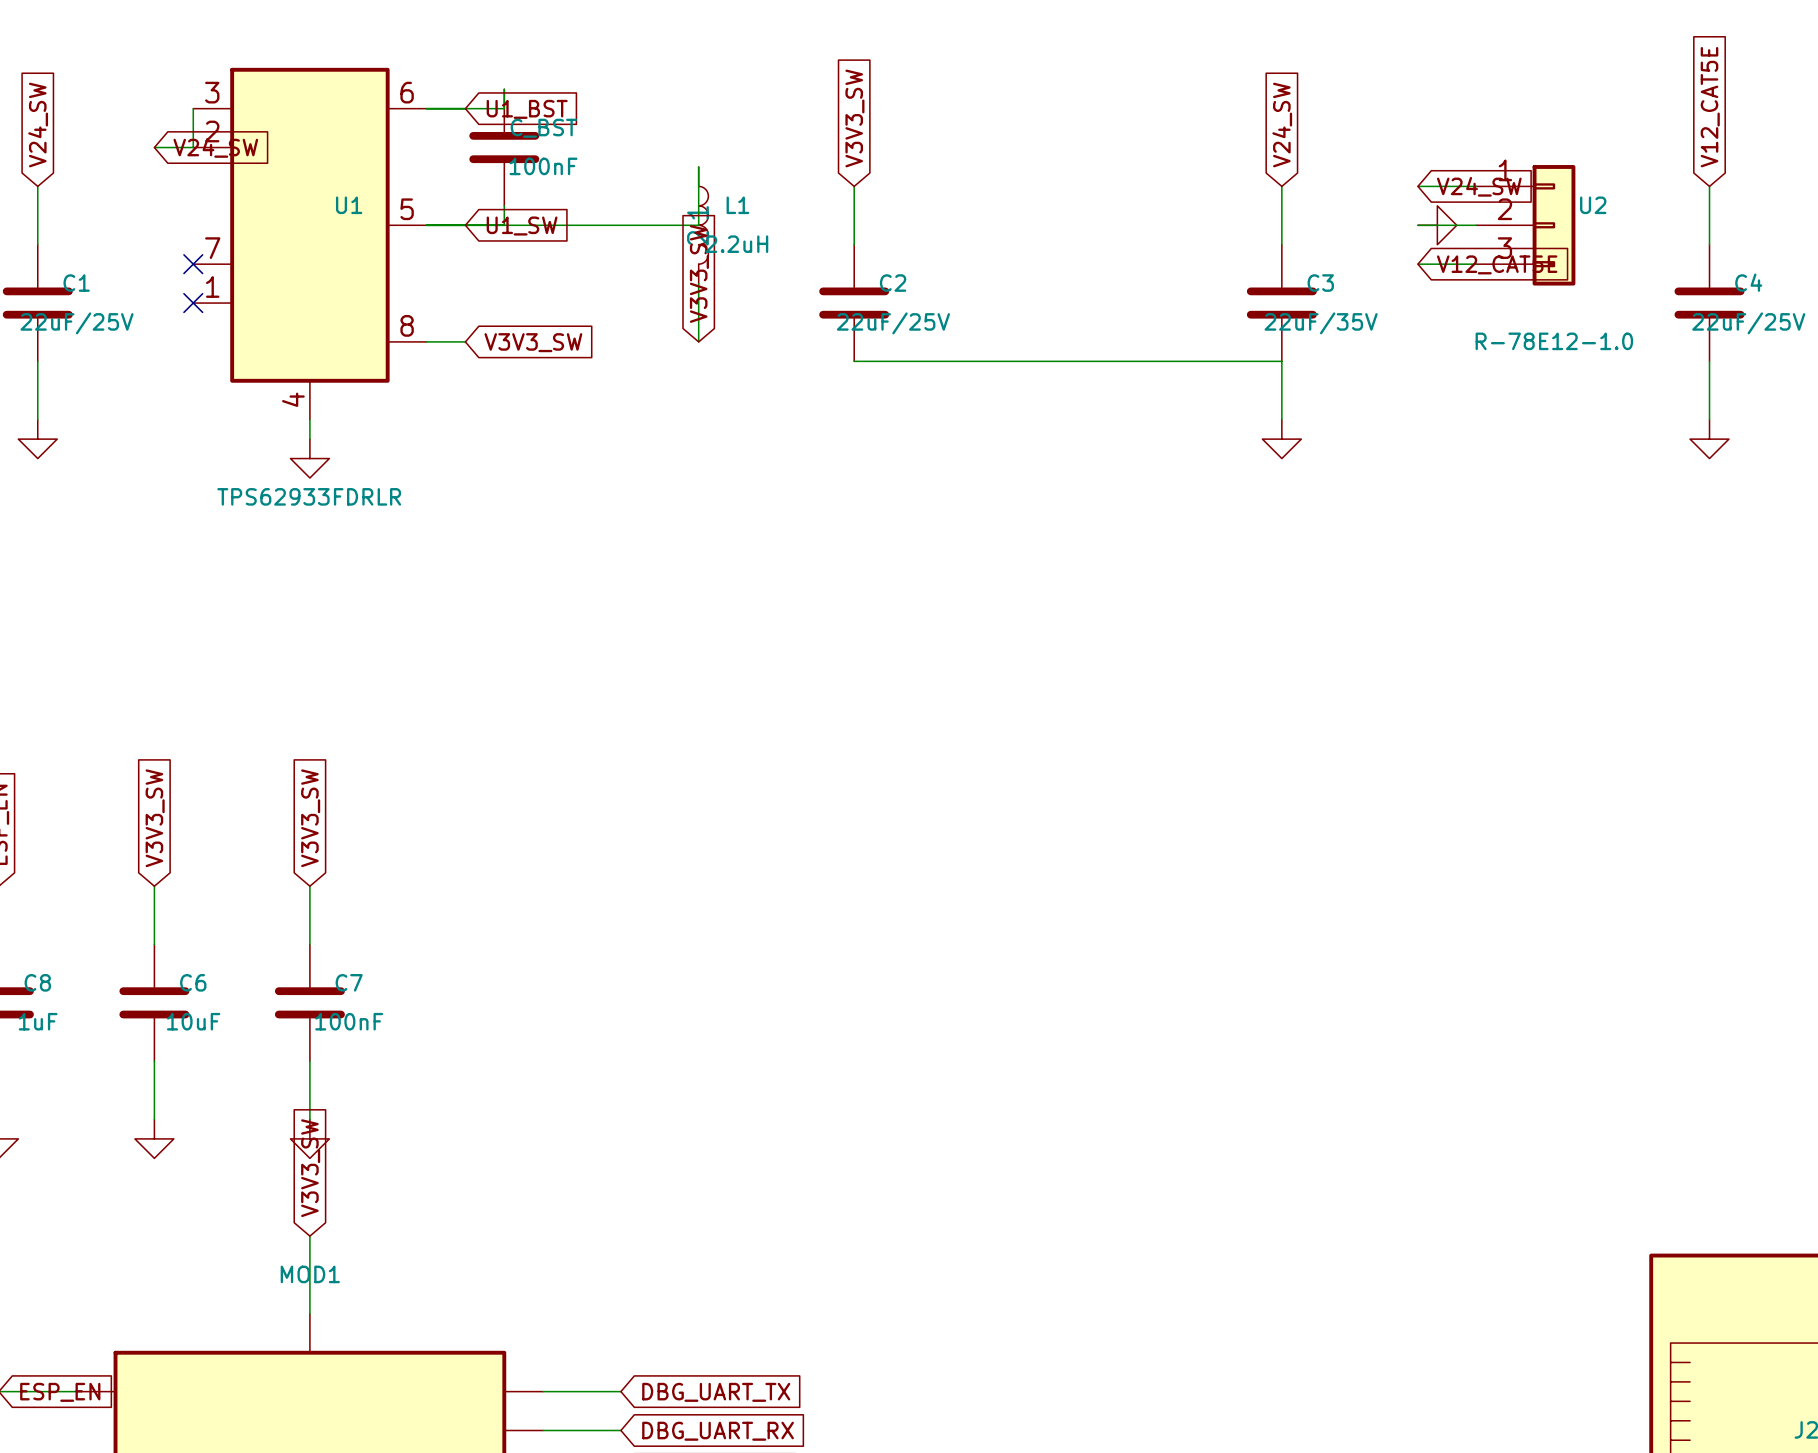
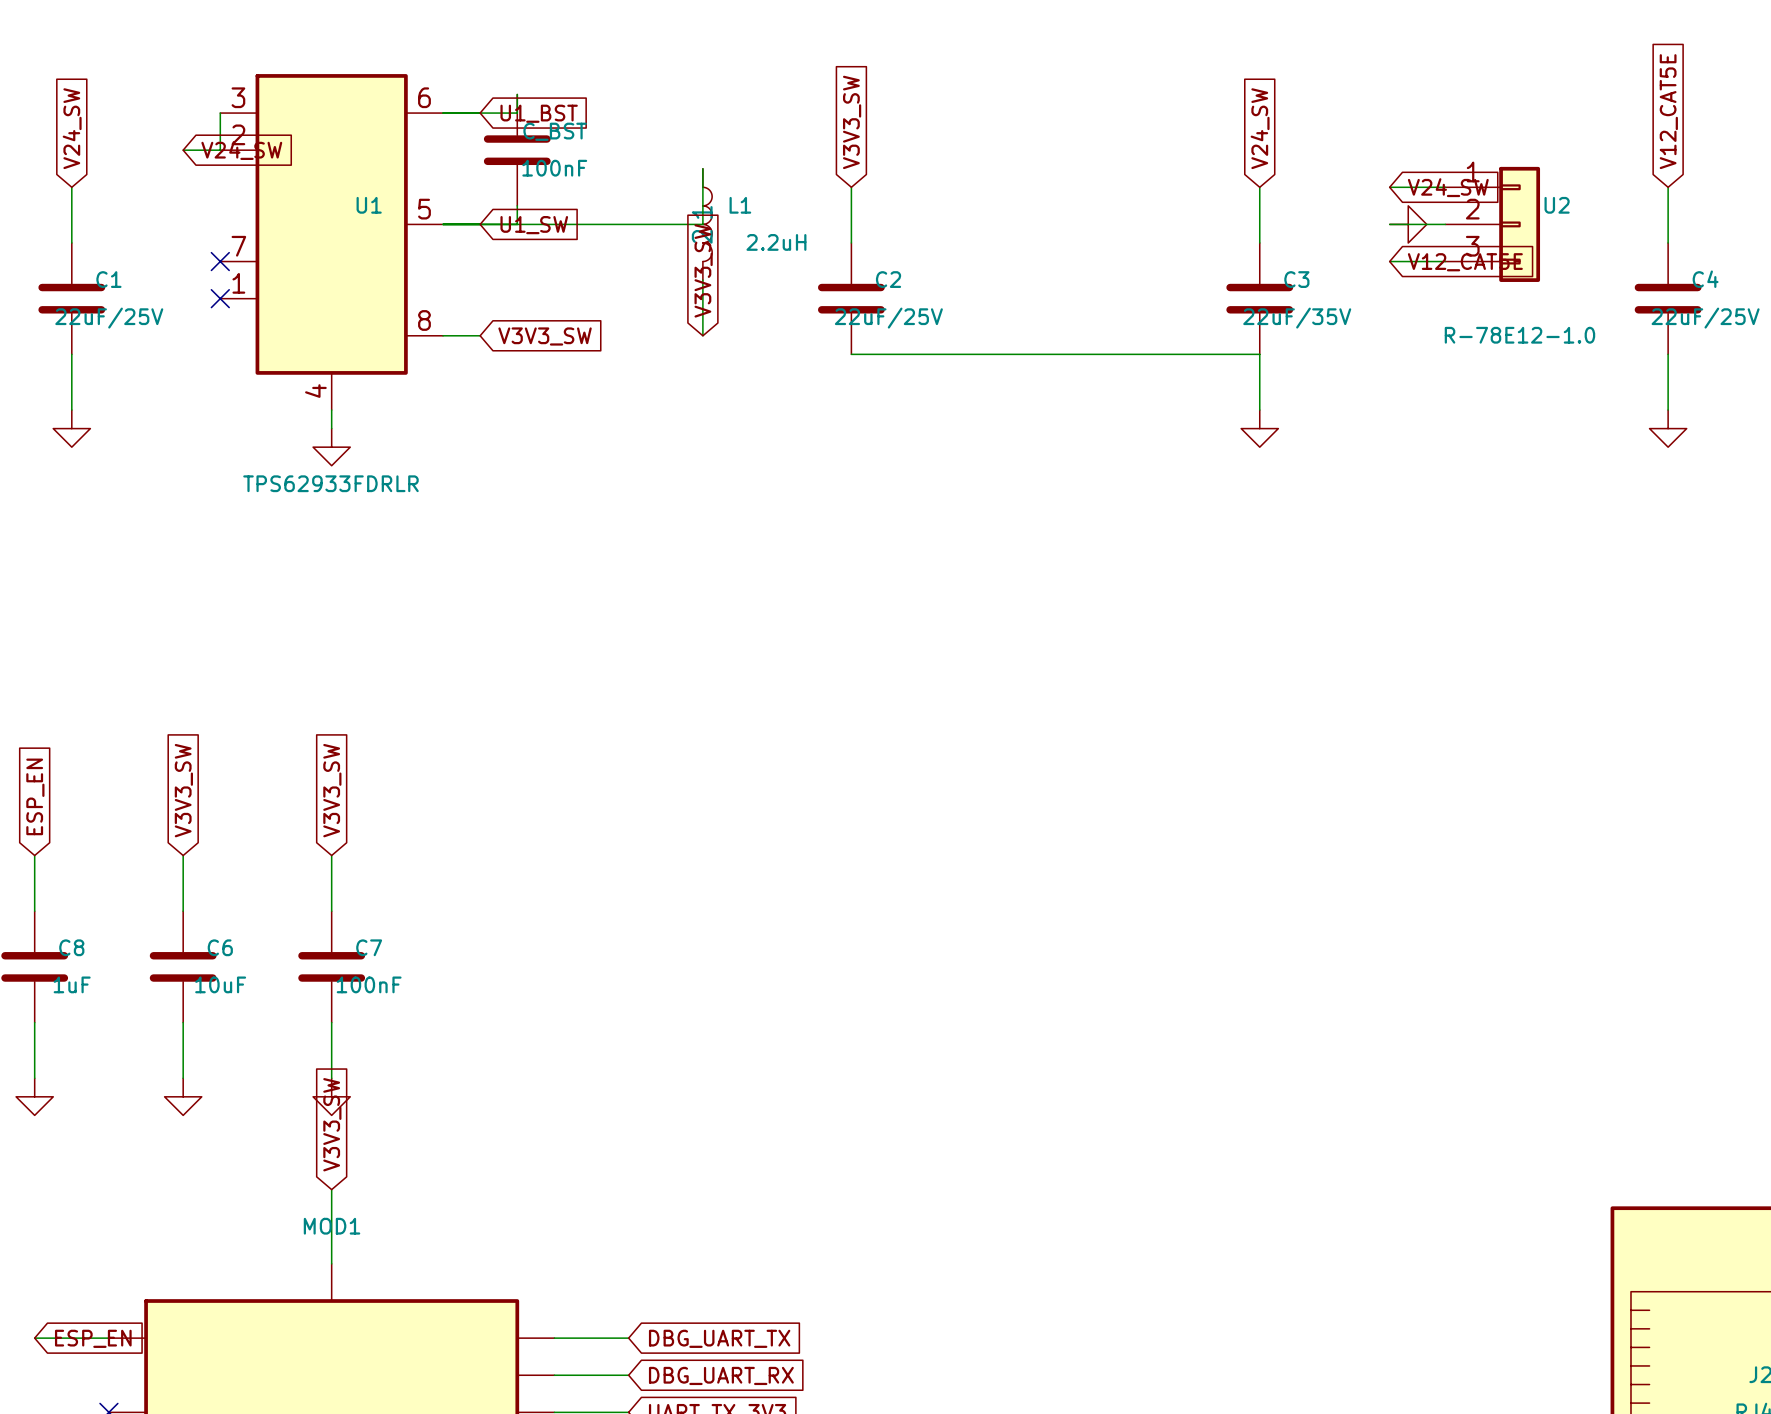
L1 value position: 2.2uH (736, 244) -> 2.2uH (776, 242)

